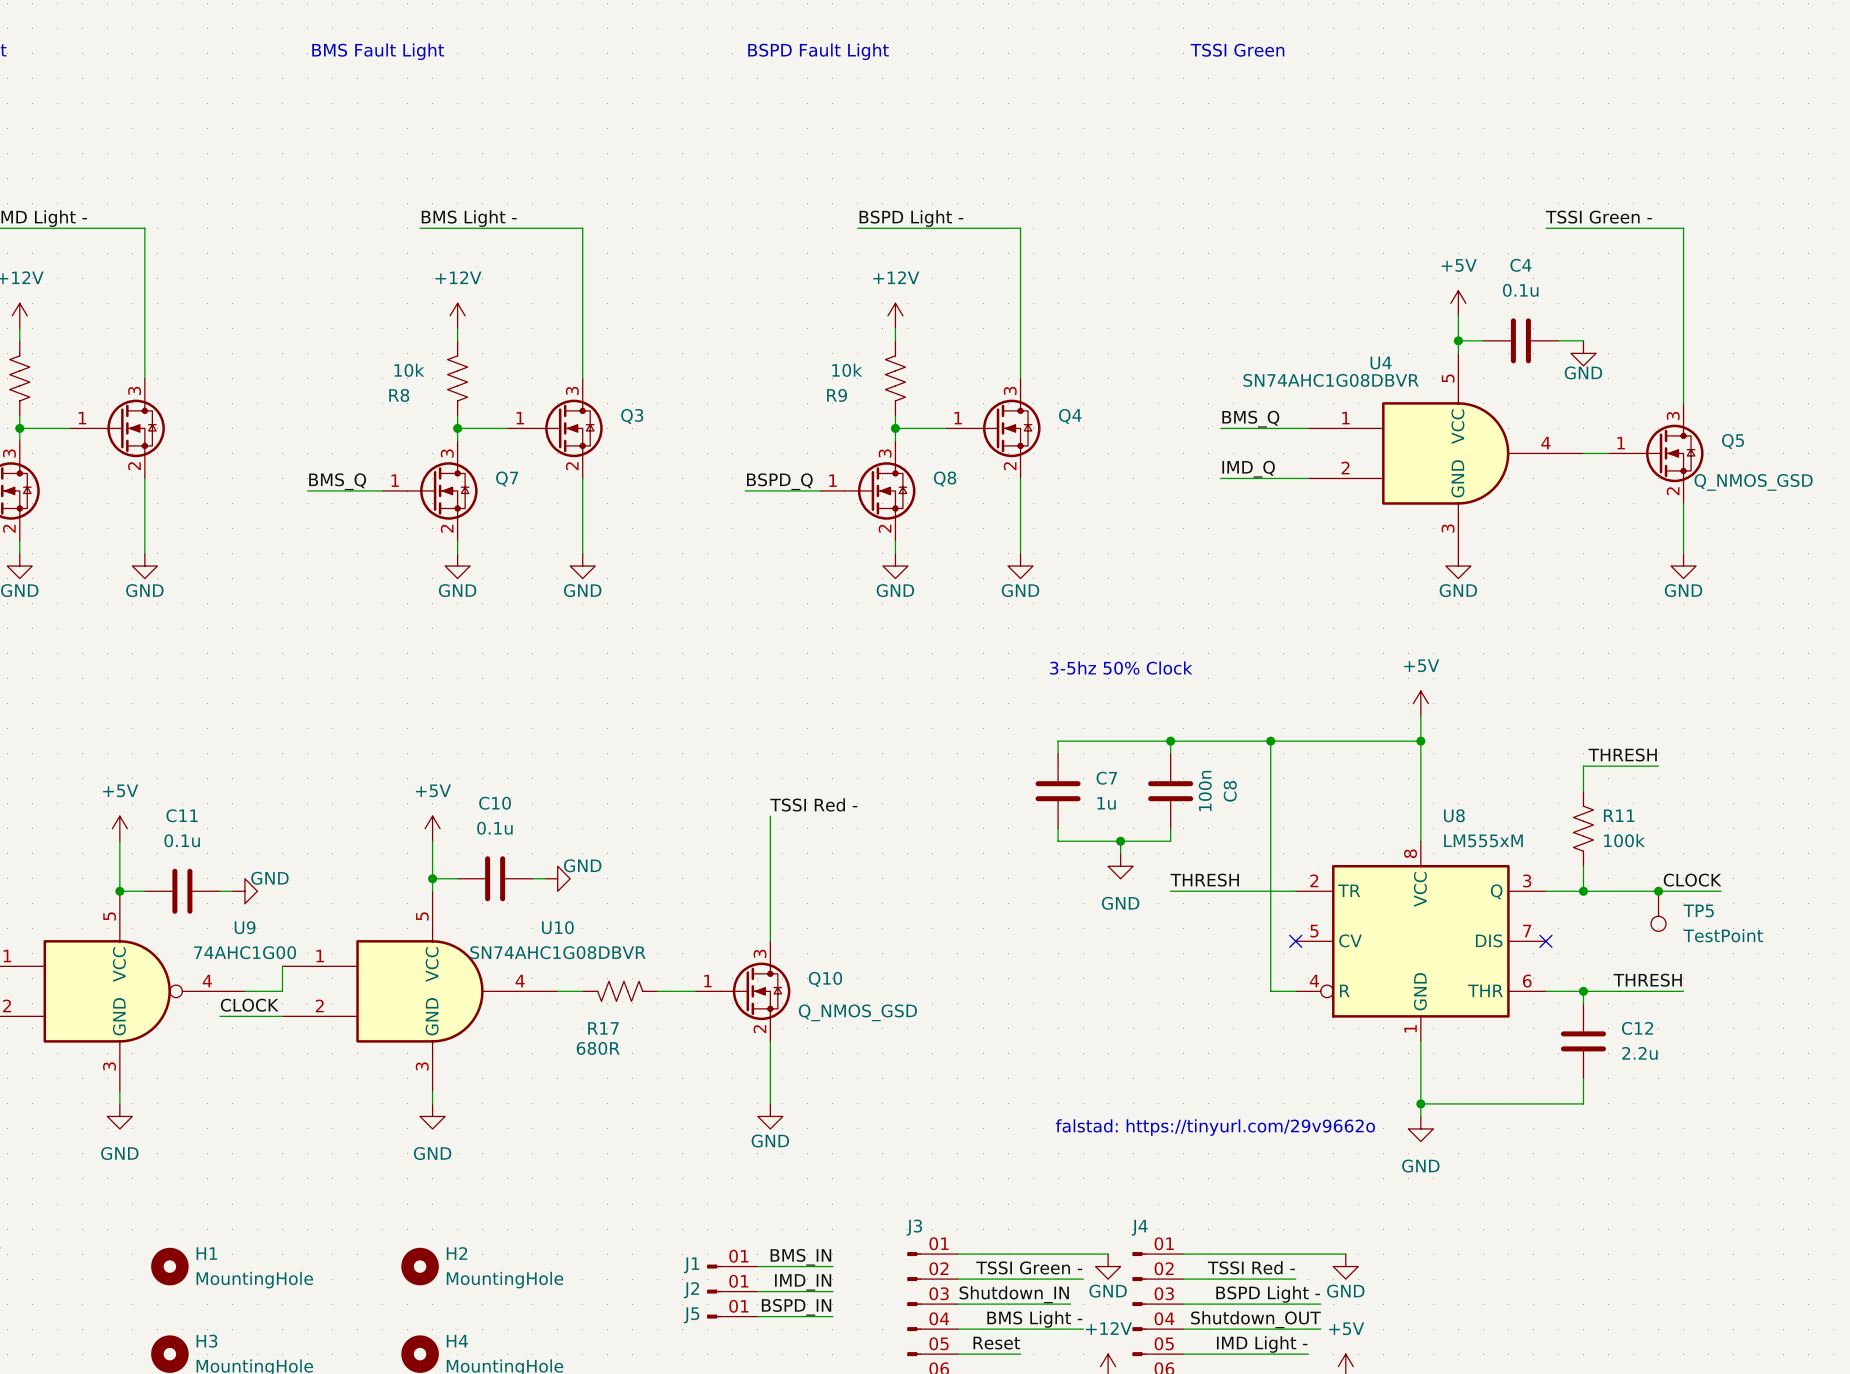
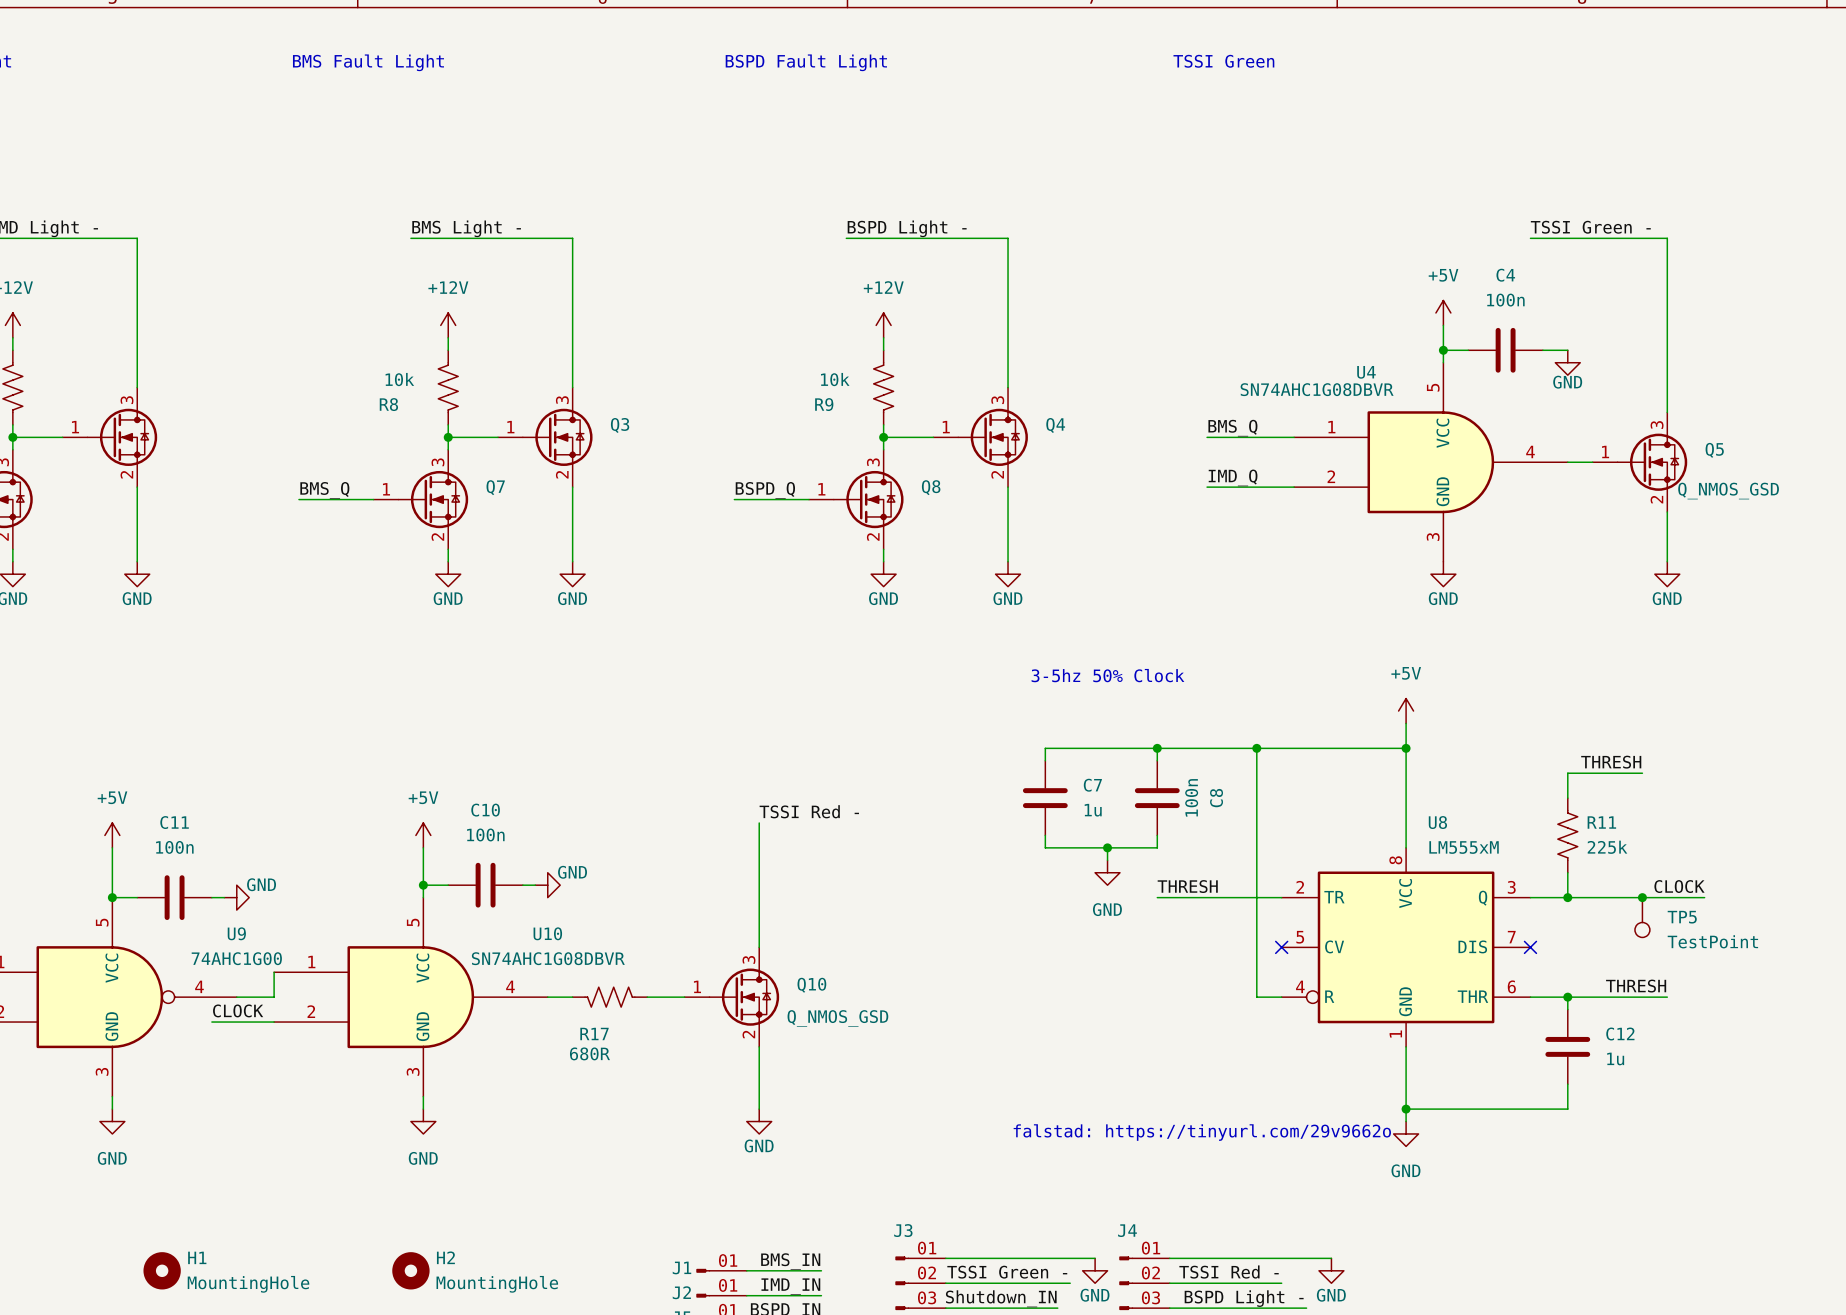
C4 value: 0.1u (1520, 290) -> 100n (1505, 300)
C10 value: 0.1u (494, 828) -> 100n (485, 834)
C11 value: 0.1u (182, 840) -> 100n (174, 847)
R11 value: 100k (1624, 840) -> 225k (1607, 847)
C12 value: 2.2u (1639, 1053) -> 1u (1615, 1058)

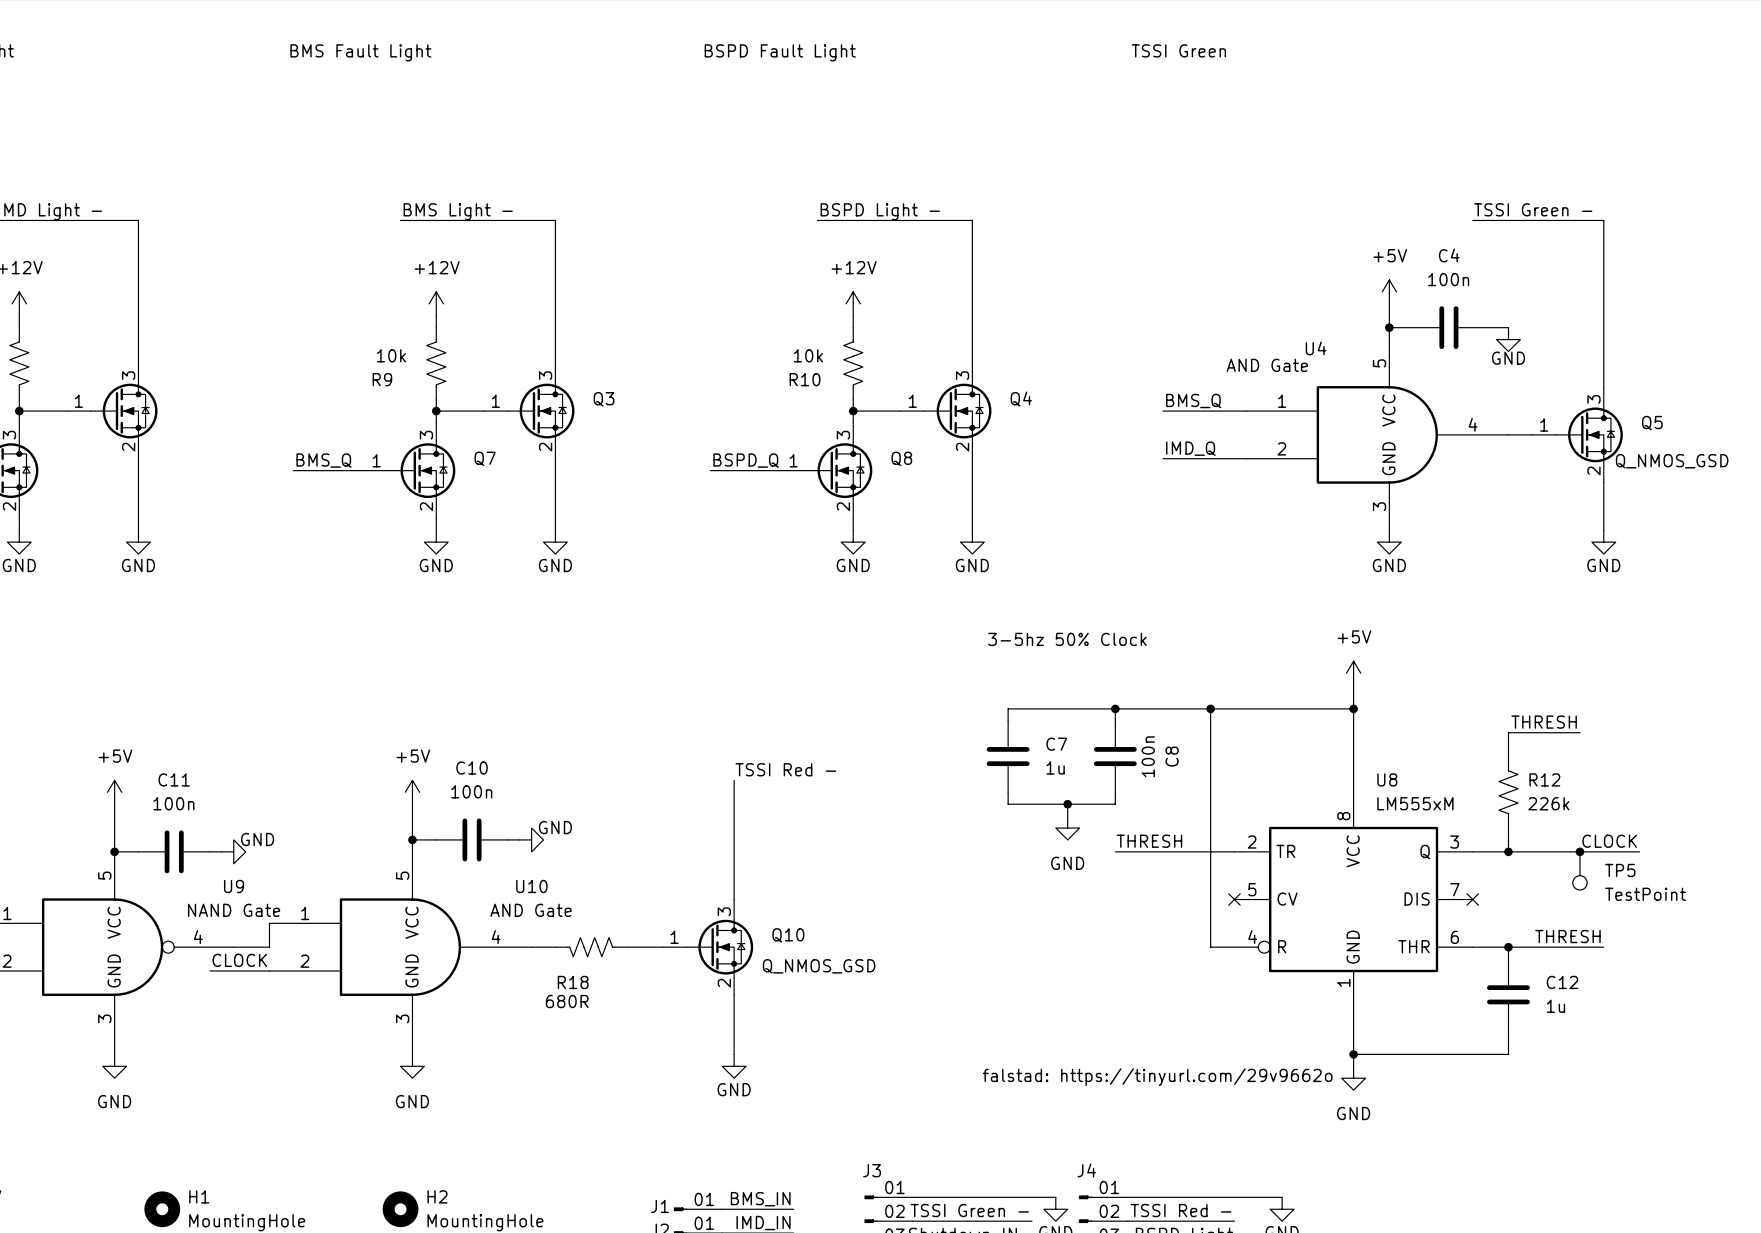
U4 value: SN74AHC1G08DBVR (1317, 389) -> AND Gate (1267, 365)
R8 name: R8 (388, 404) -> R9 (382, 379)
R9 name: R9 (824, 404) -> R10 (805, 379)
R11 name: R11 (1601, 822) -> R12 (1544, 779)
R11 value: 225k (1607, 847) -> 226k (1548, 803)
U9 value: 74AHC1G00 (236, 958) -> NAND Gate (234, 910)
U10 value: SN74AHC1G08DBVR (548, 958) -> AND Gate (531, 910)
R17 name: R17 (594, 1033) -> R18 (573, 982)

